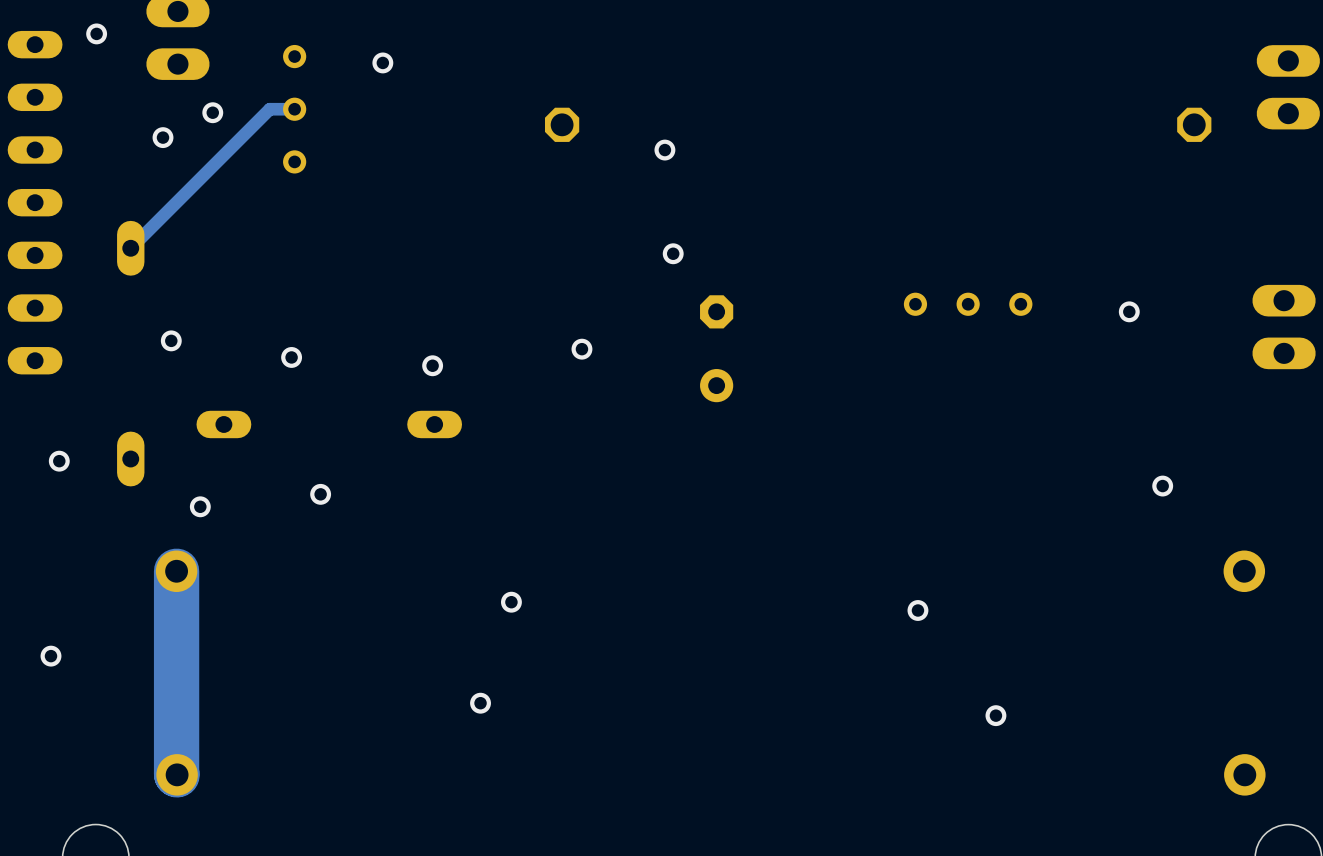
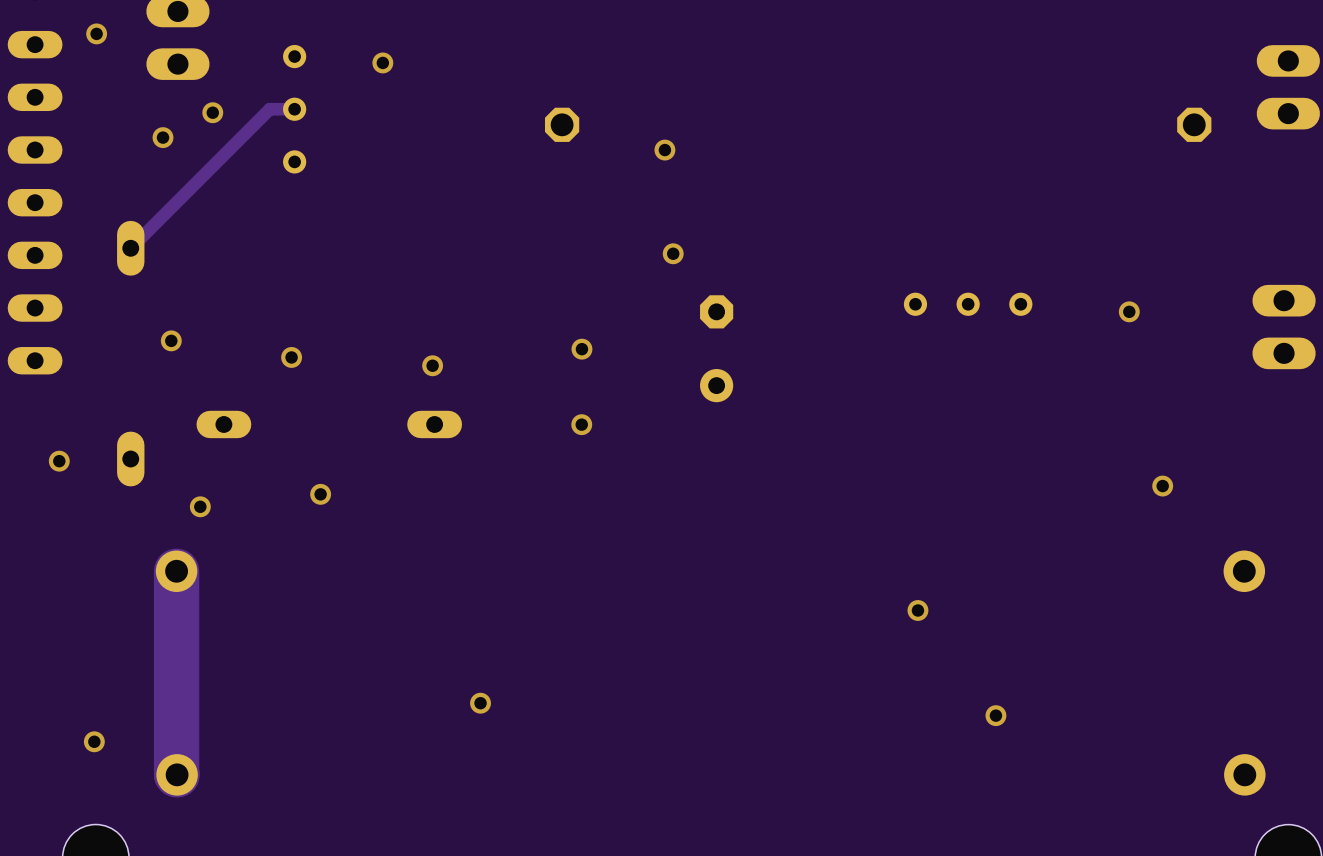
via: none -> (581, 424)
via: (511, 602) -> none
via position: (51, 656) -> (94, 741)

